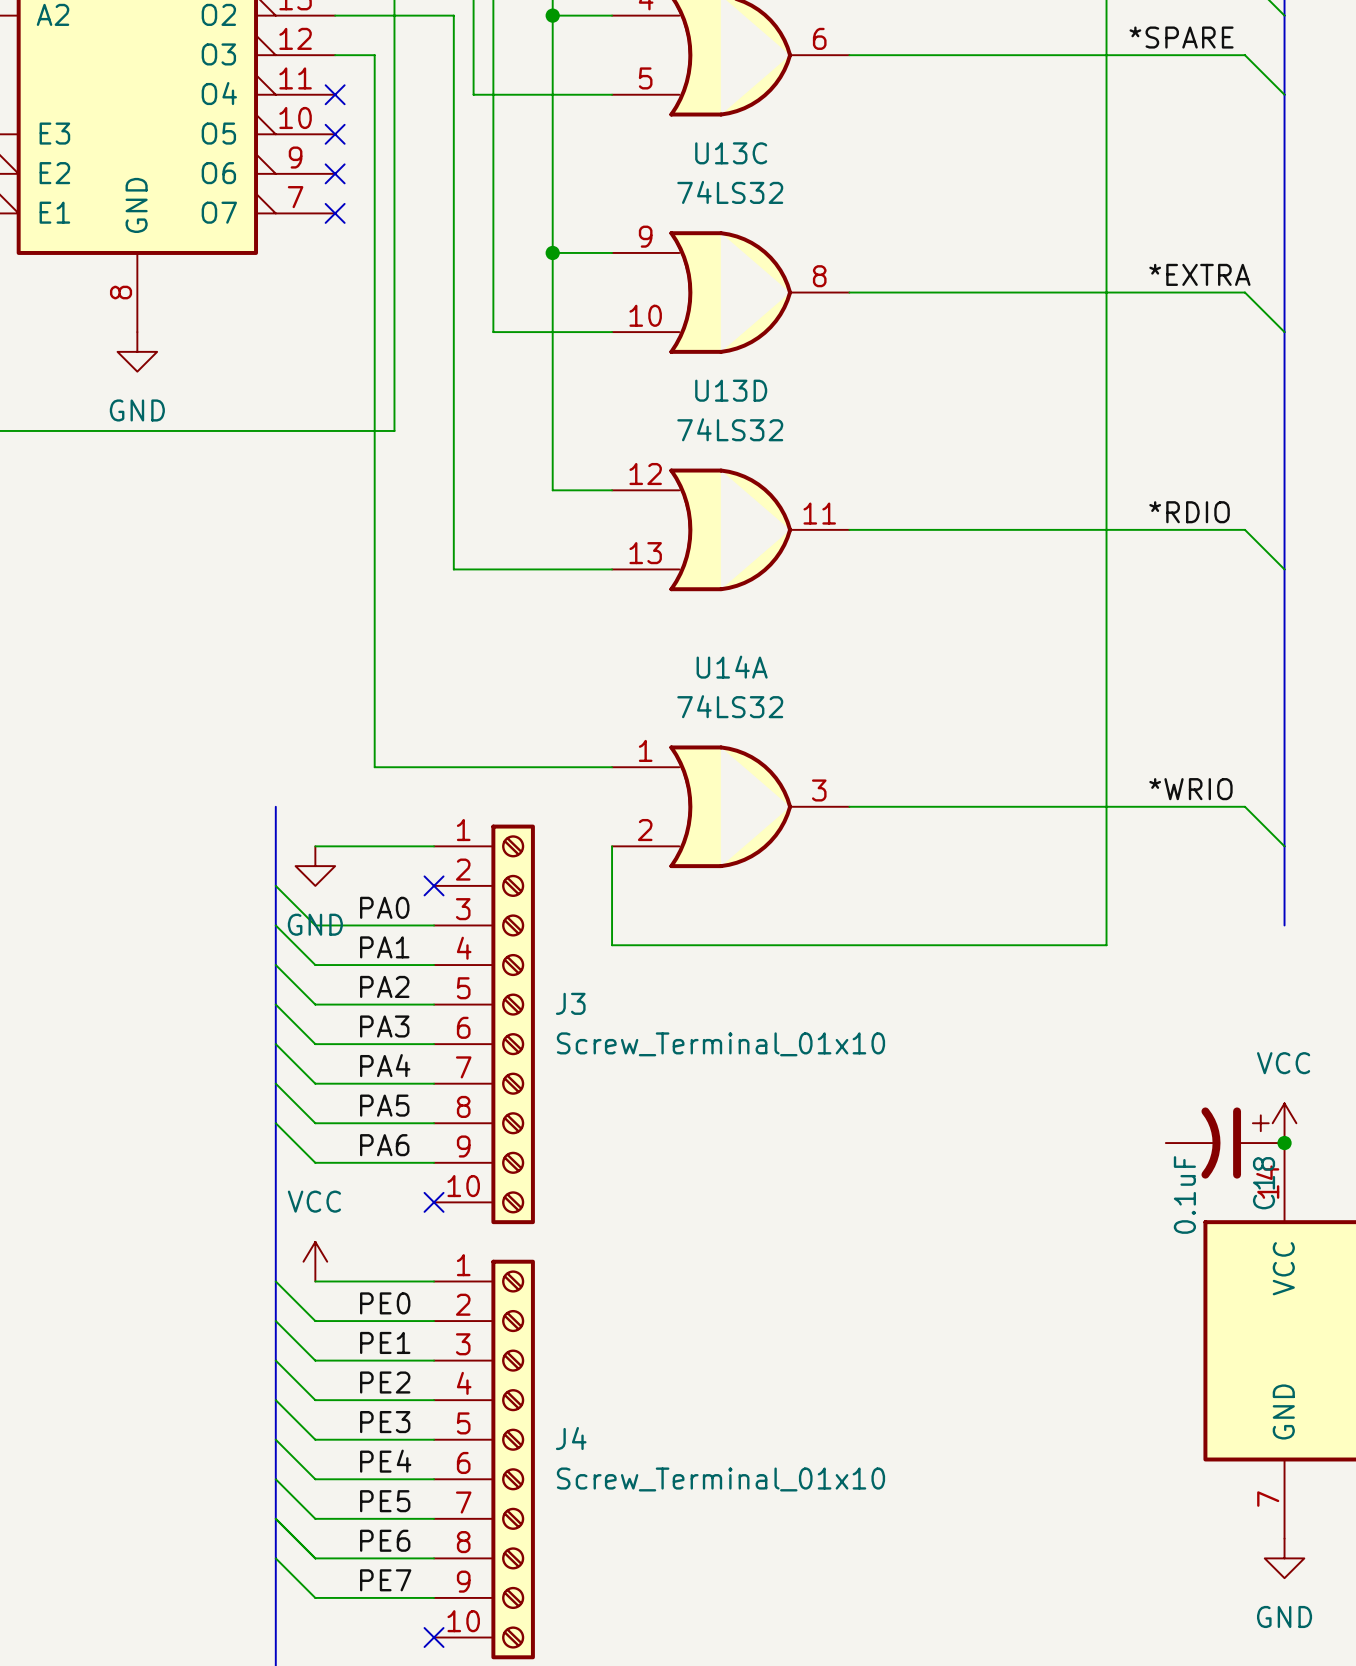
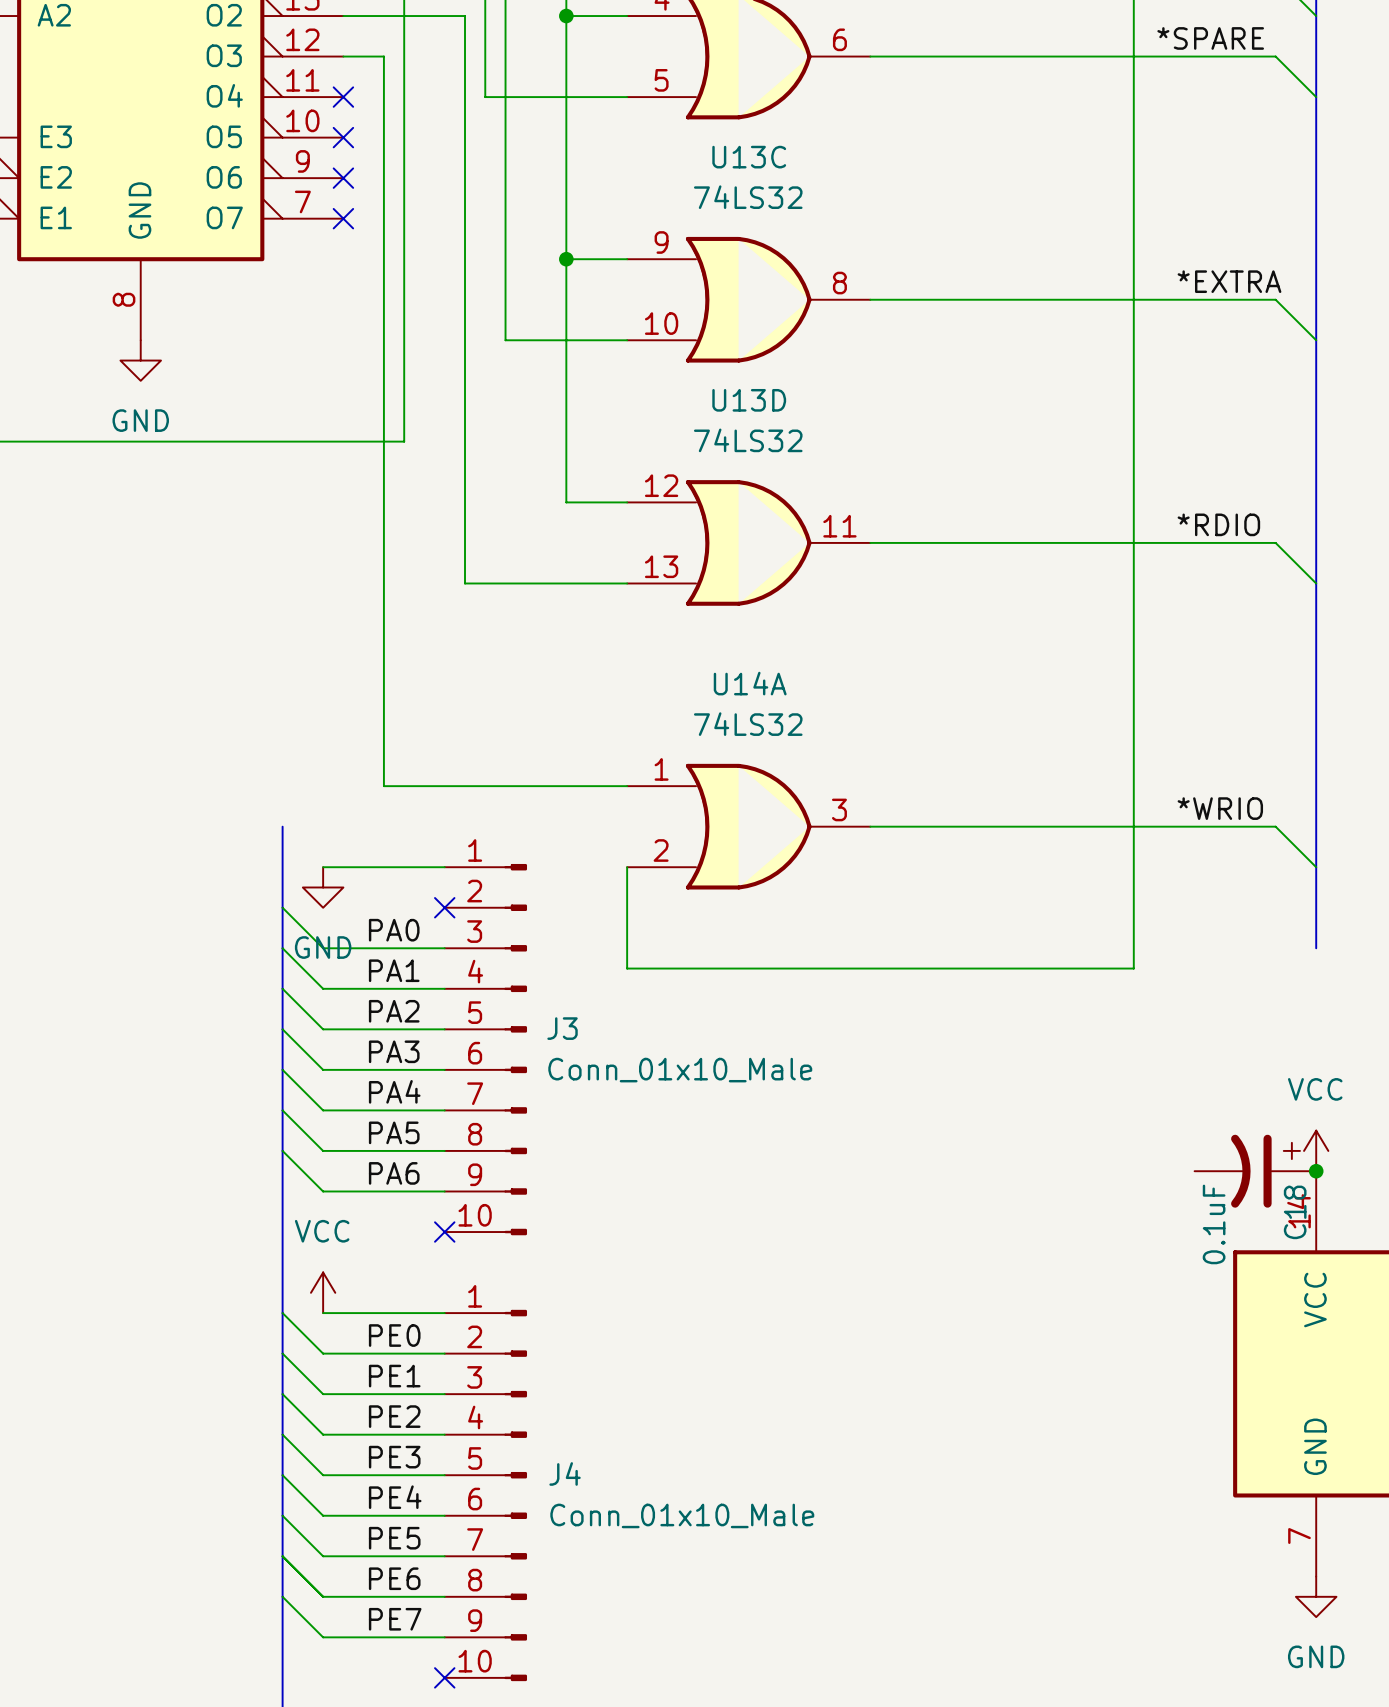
J3 symbol: [434, 824, 535, 1225] -> [444, 863, 528, 1236]
J3 value: Screw_Terminal_01x10 (720, 1044) -> Conn_01x10_Male (680, 1070)
J4 symbol: [434, 1259, 535, 1660] -> [444, 1309, 528, 1682]
J4 value: Screw_Terminal_01x10 (720, 1479) -> Conn_01x10_Male (682, 1515)

